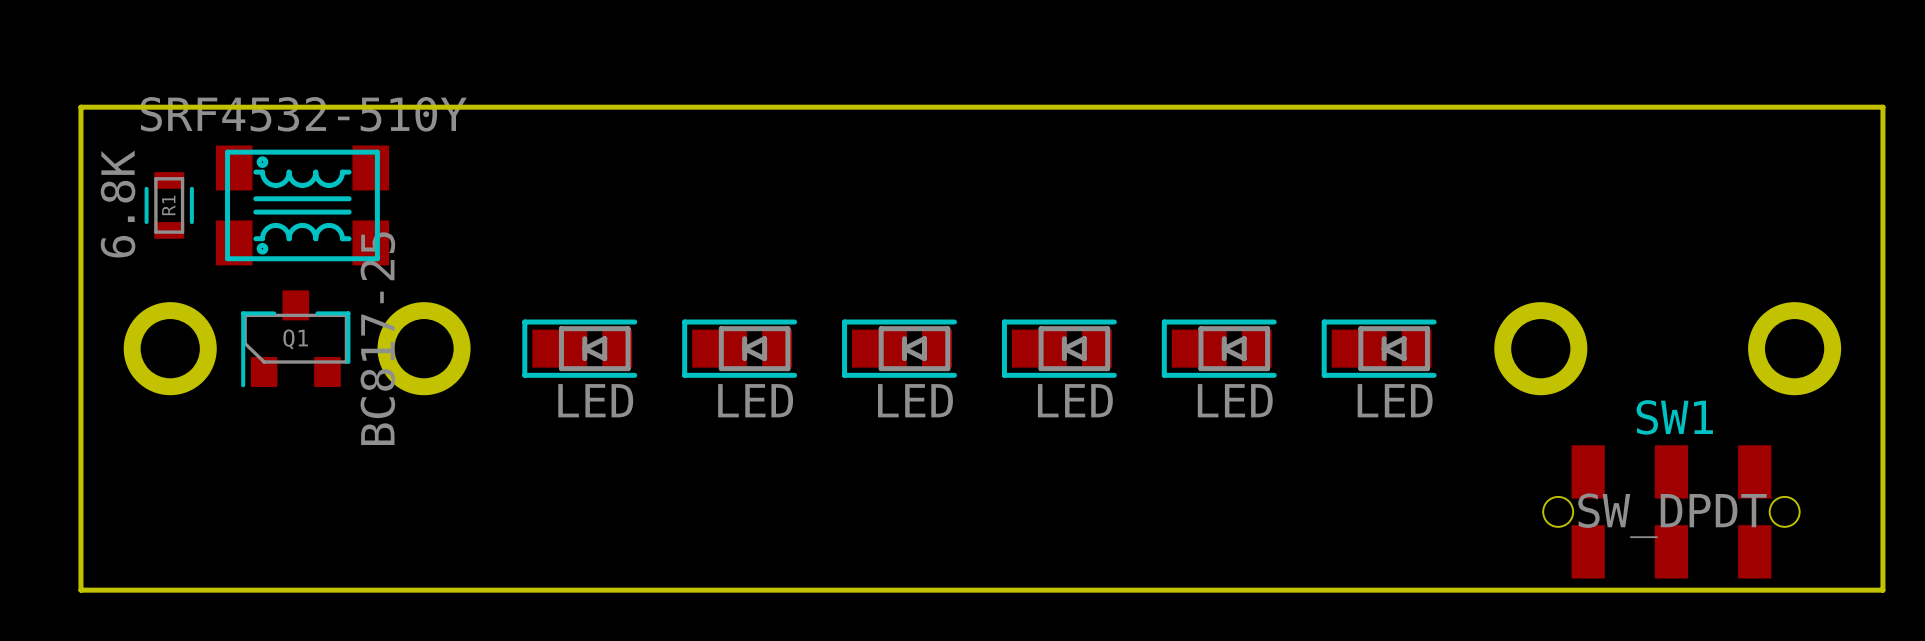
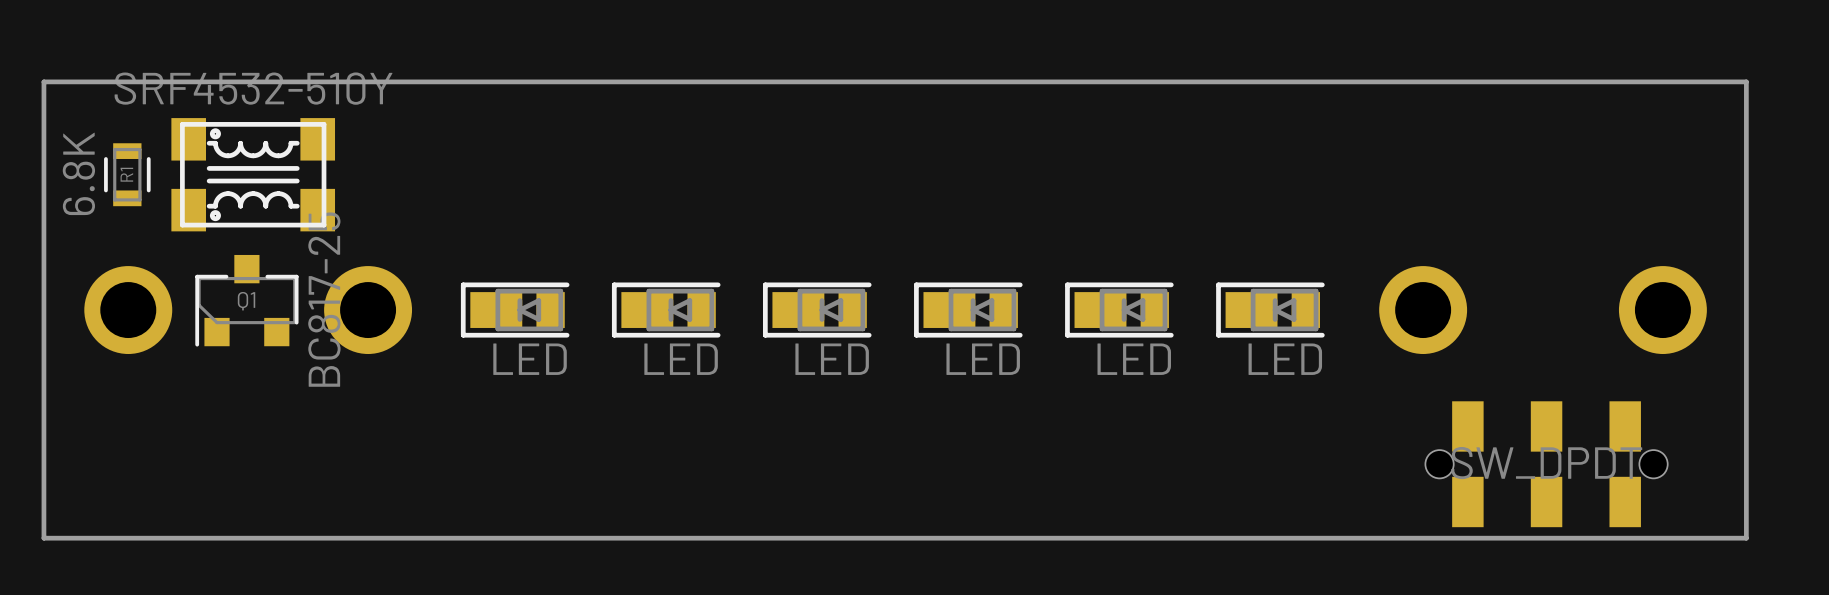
SW1 name: SW1 (1674, 417) -> none

